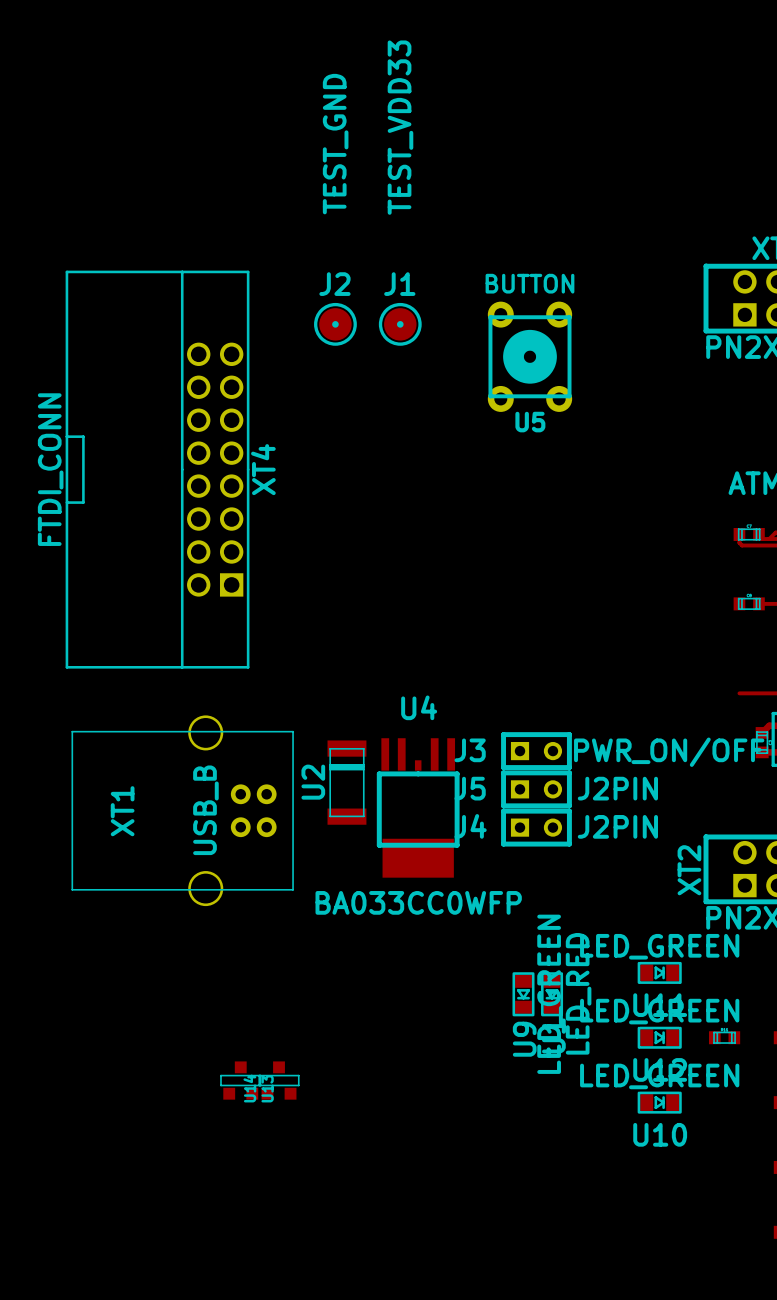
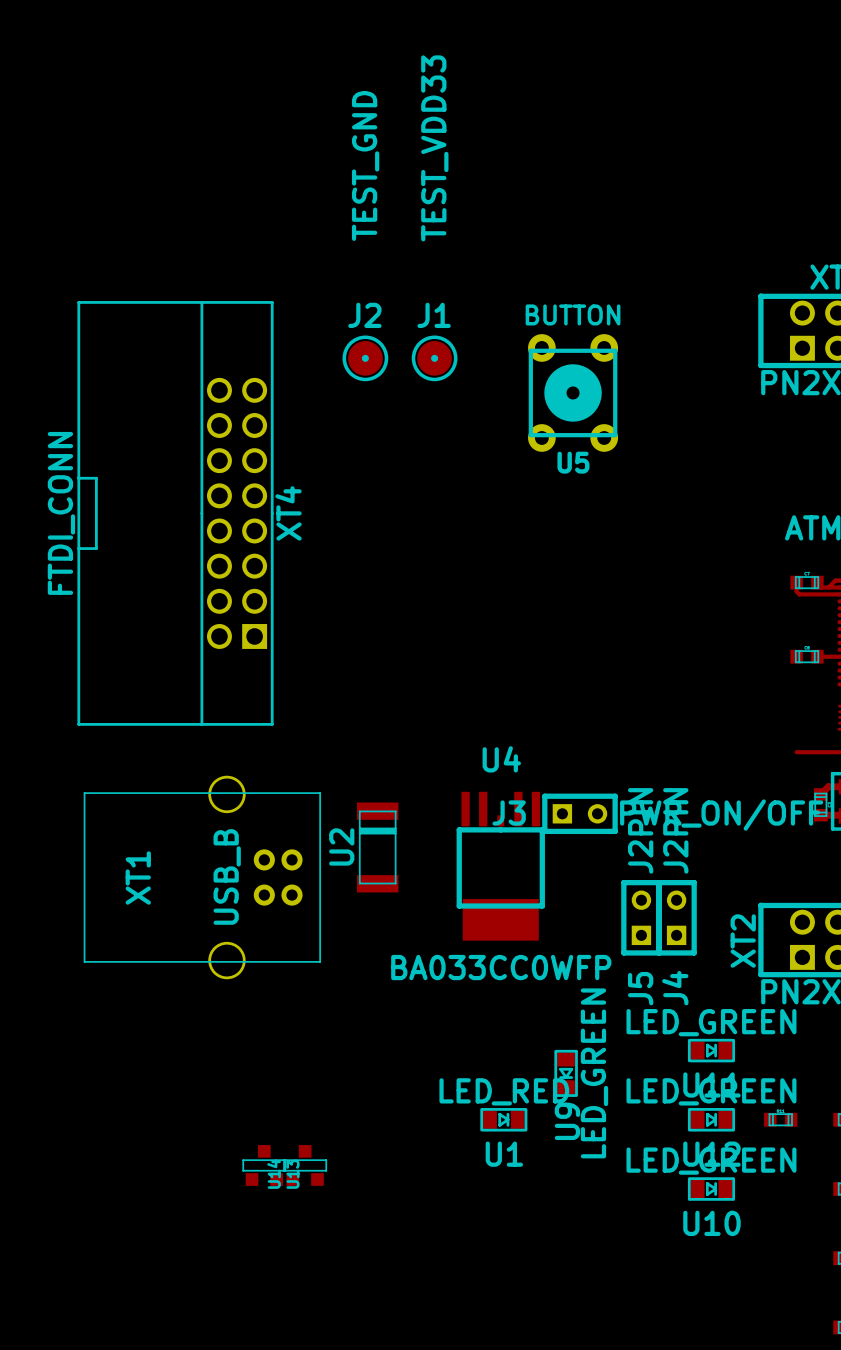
J5 rotation: 0° (536, 789) -> 90° counterclockwise (641, 917)
J5 position: (536, 789) -> (641, 917)
U4 position: (418, 807) -> (500, 866)
J4 rotation: 0° (536, 827) -> 90° counterclockwise (676, 917)
J4 position: (536, 827) -> (676, 917)
U1 rotation: 0° (552, 994) -> 90° counterclockwise (503, 1119)
U1 position: (552, 994) -> (503, 1119)

